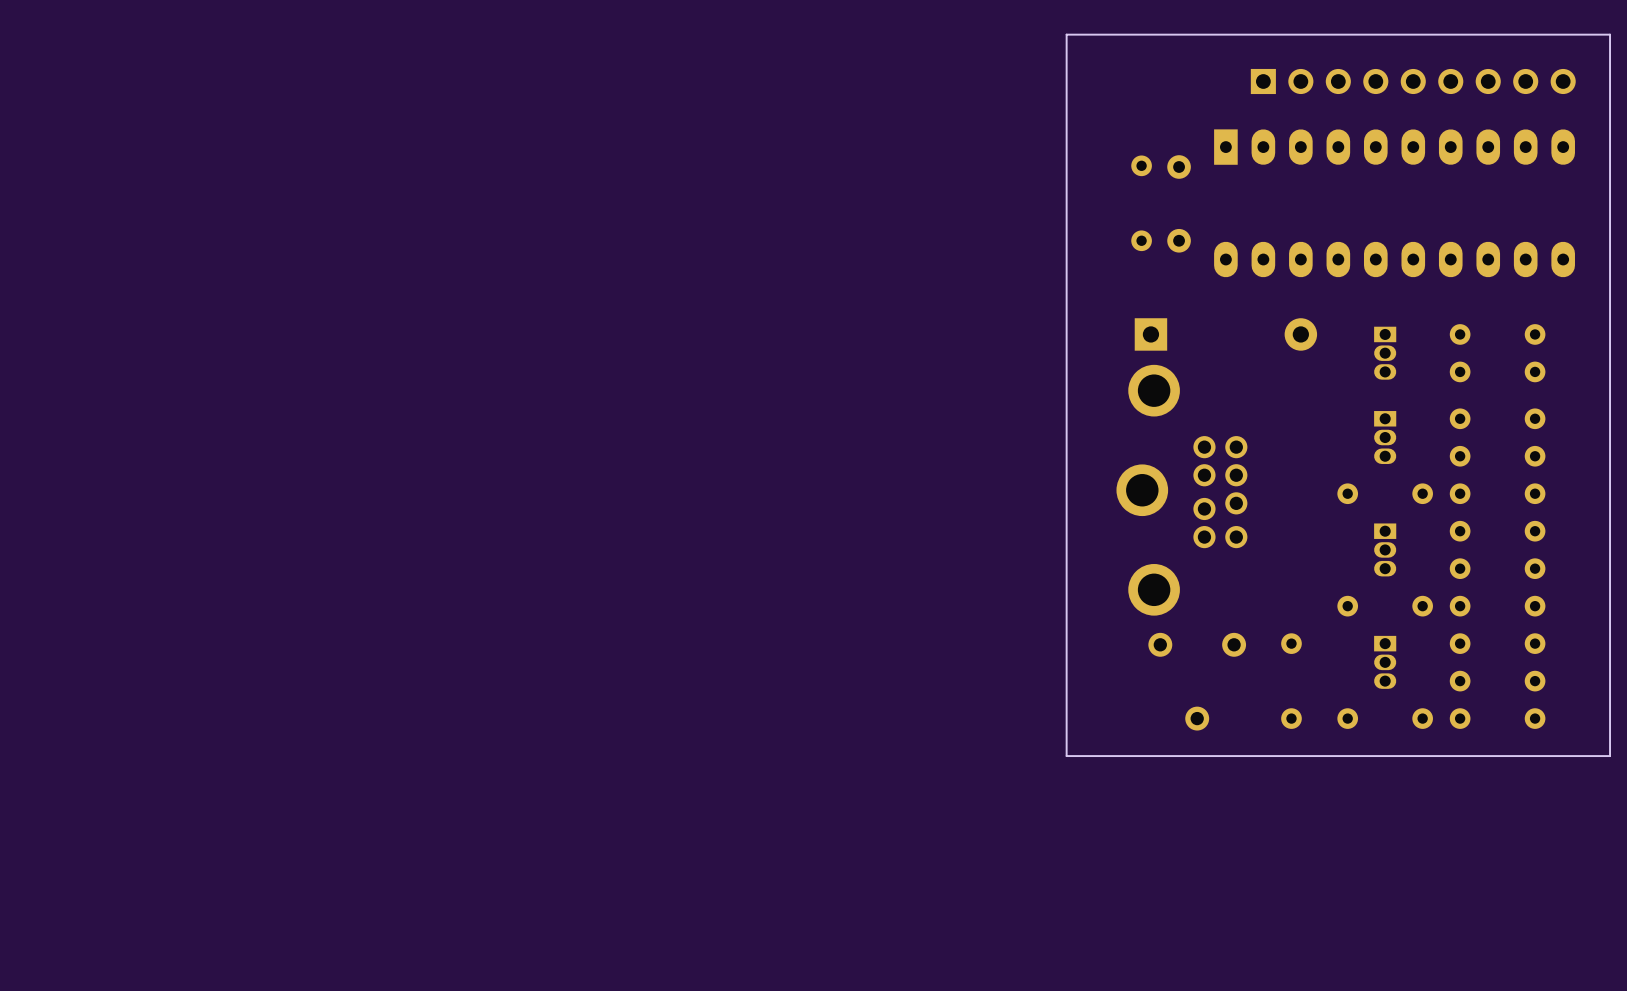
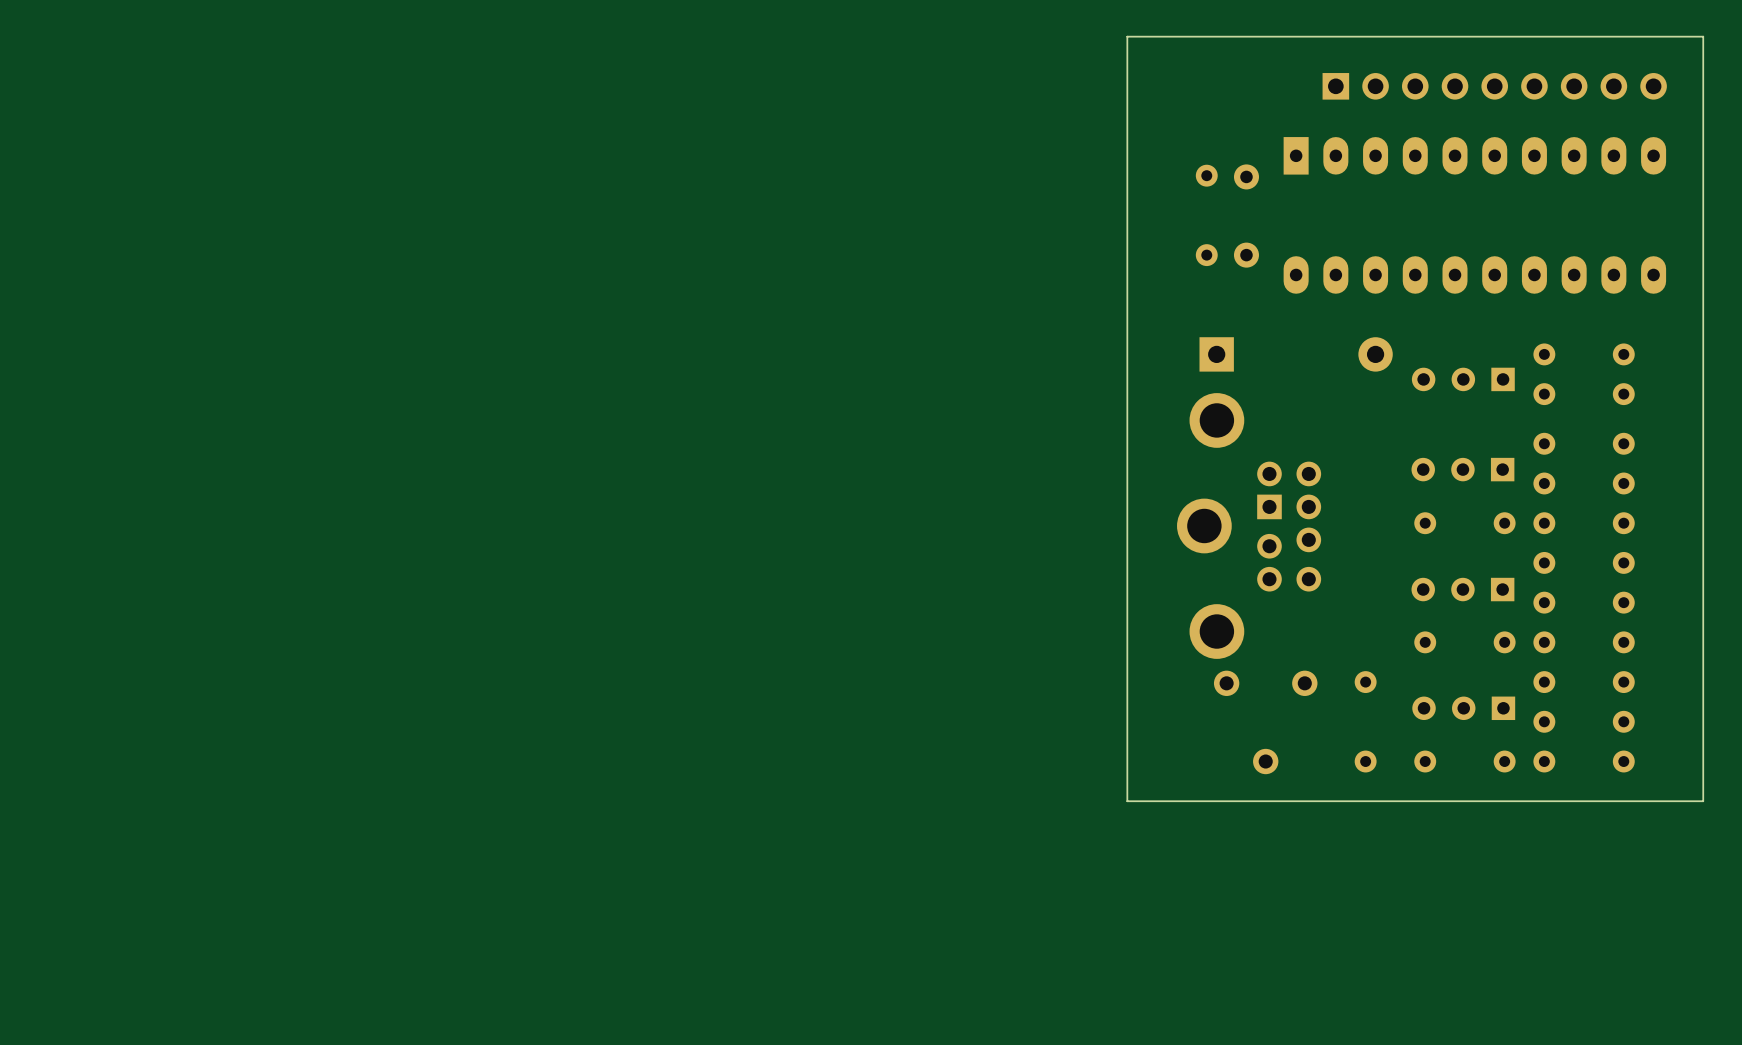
part footprint: [1374, 326, 1397, 380] -> [1411, 367, 1515, 392]
part footprint: [1116, 364, 1248, 616] -> [1177, 393, 1322, 659]
part footprint: [1374, 411, 1397, 465] -> [1411, 457, 1515, 482]
part footprint: [1374, 523, 1397, 577] -> [1411, 577, 1515, 602]
part footprint: [1374, 635, 1397, 689] -> [1412, 696, 1516, 721]

